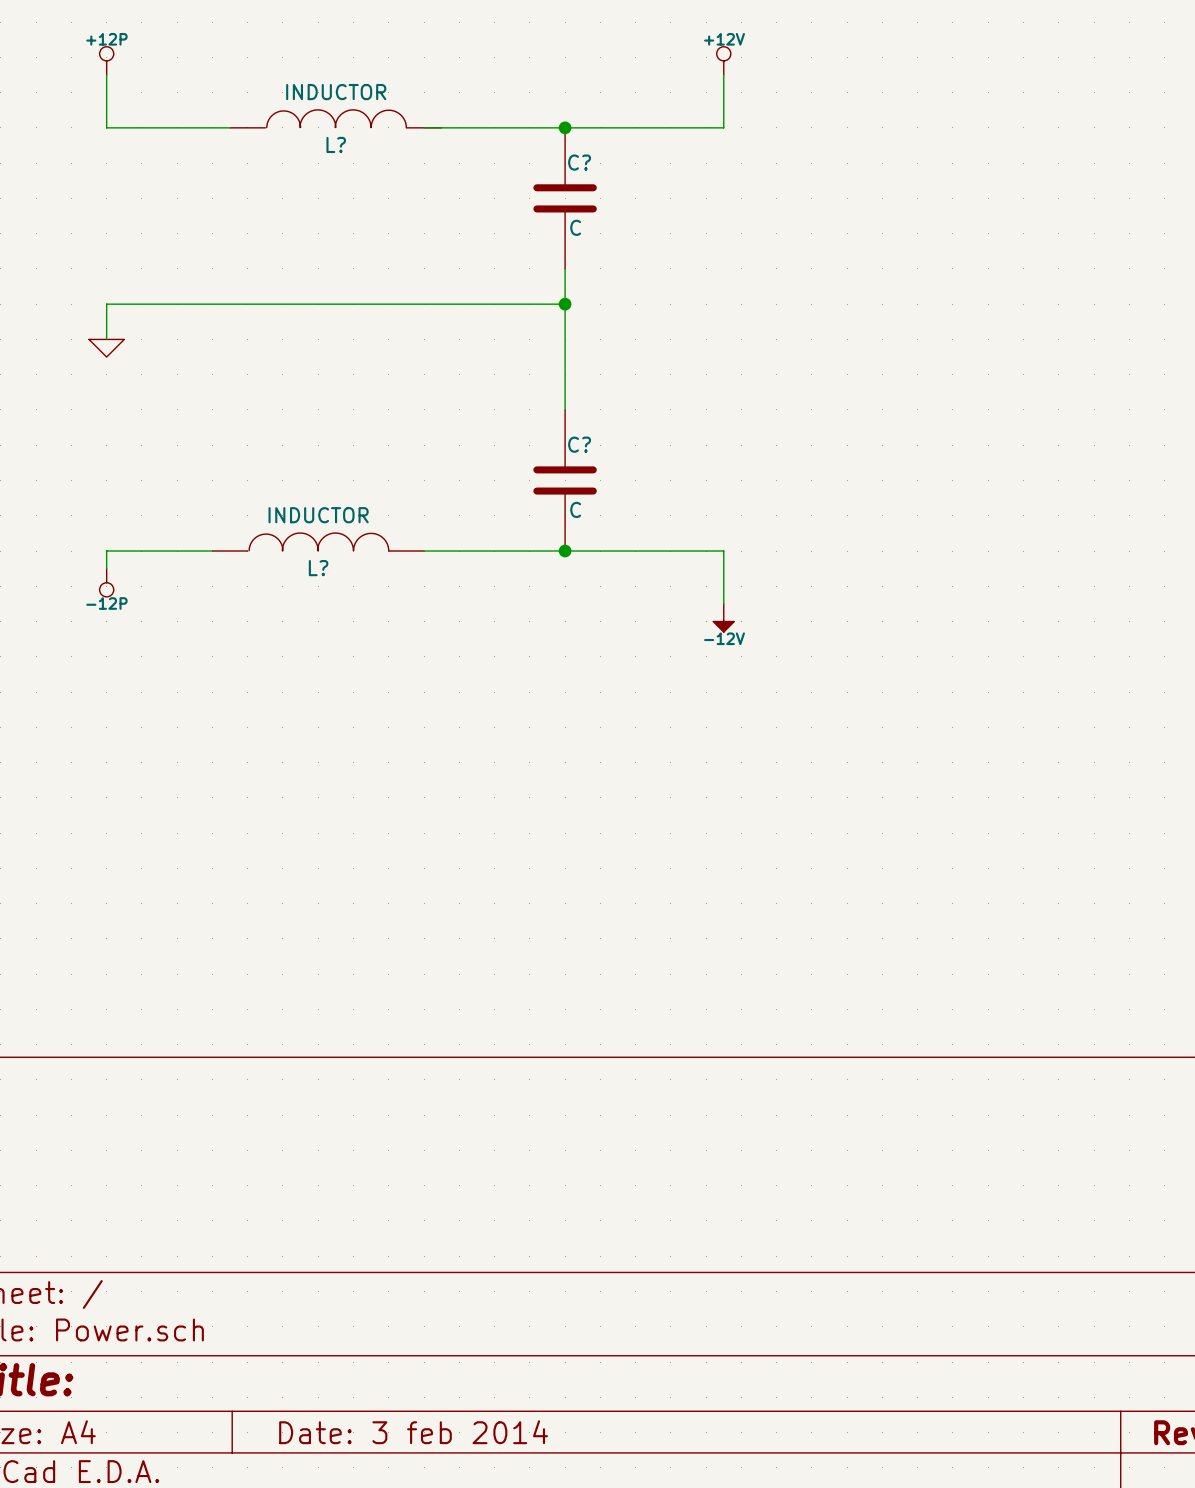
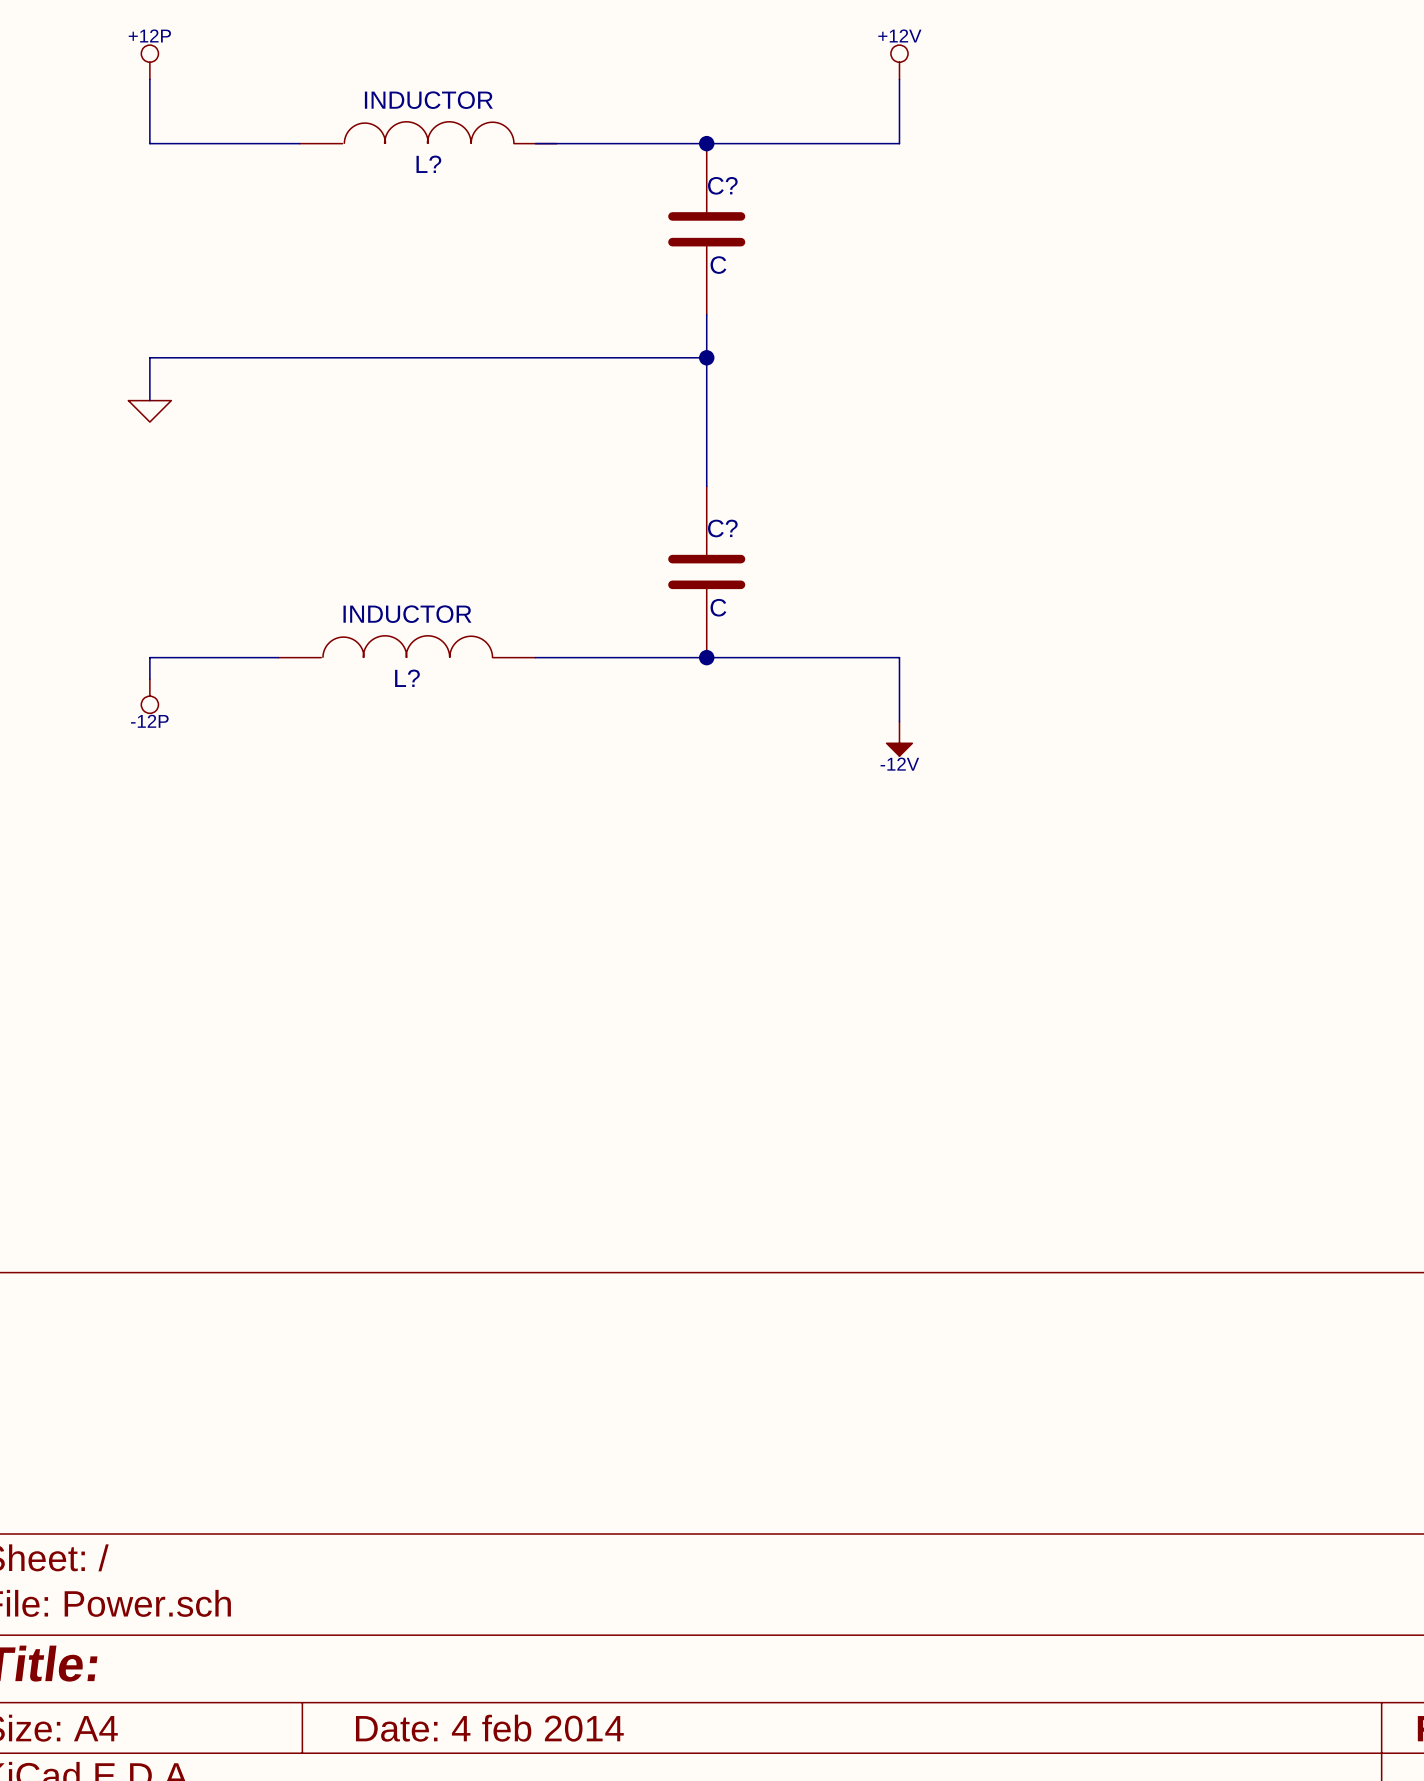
title block: Date: 3 feb 2014 (413, 1432) -> Date: 4 feb 2014 (489, 1728)

